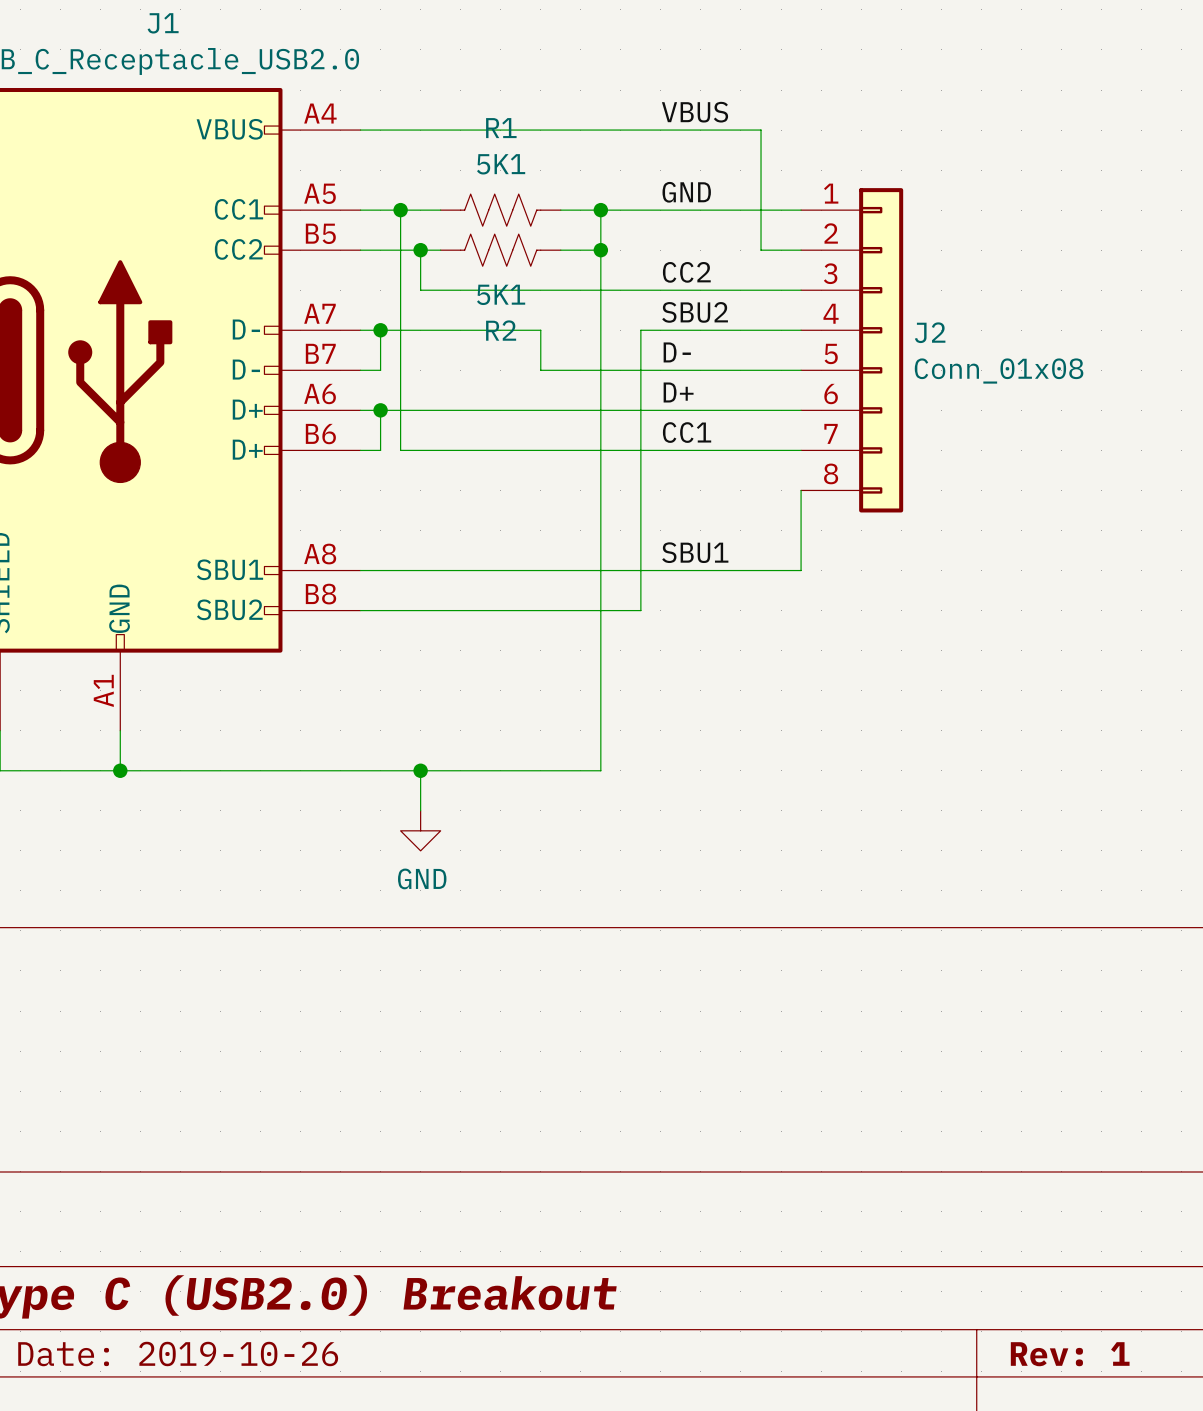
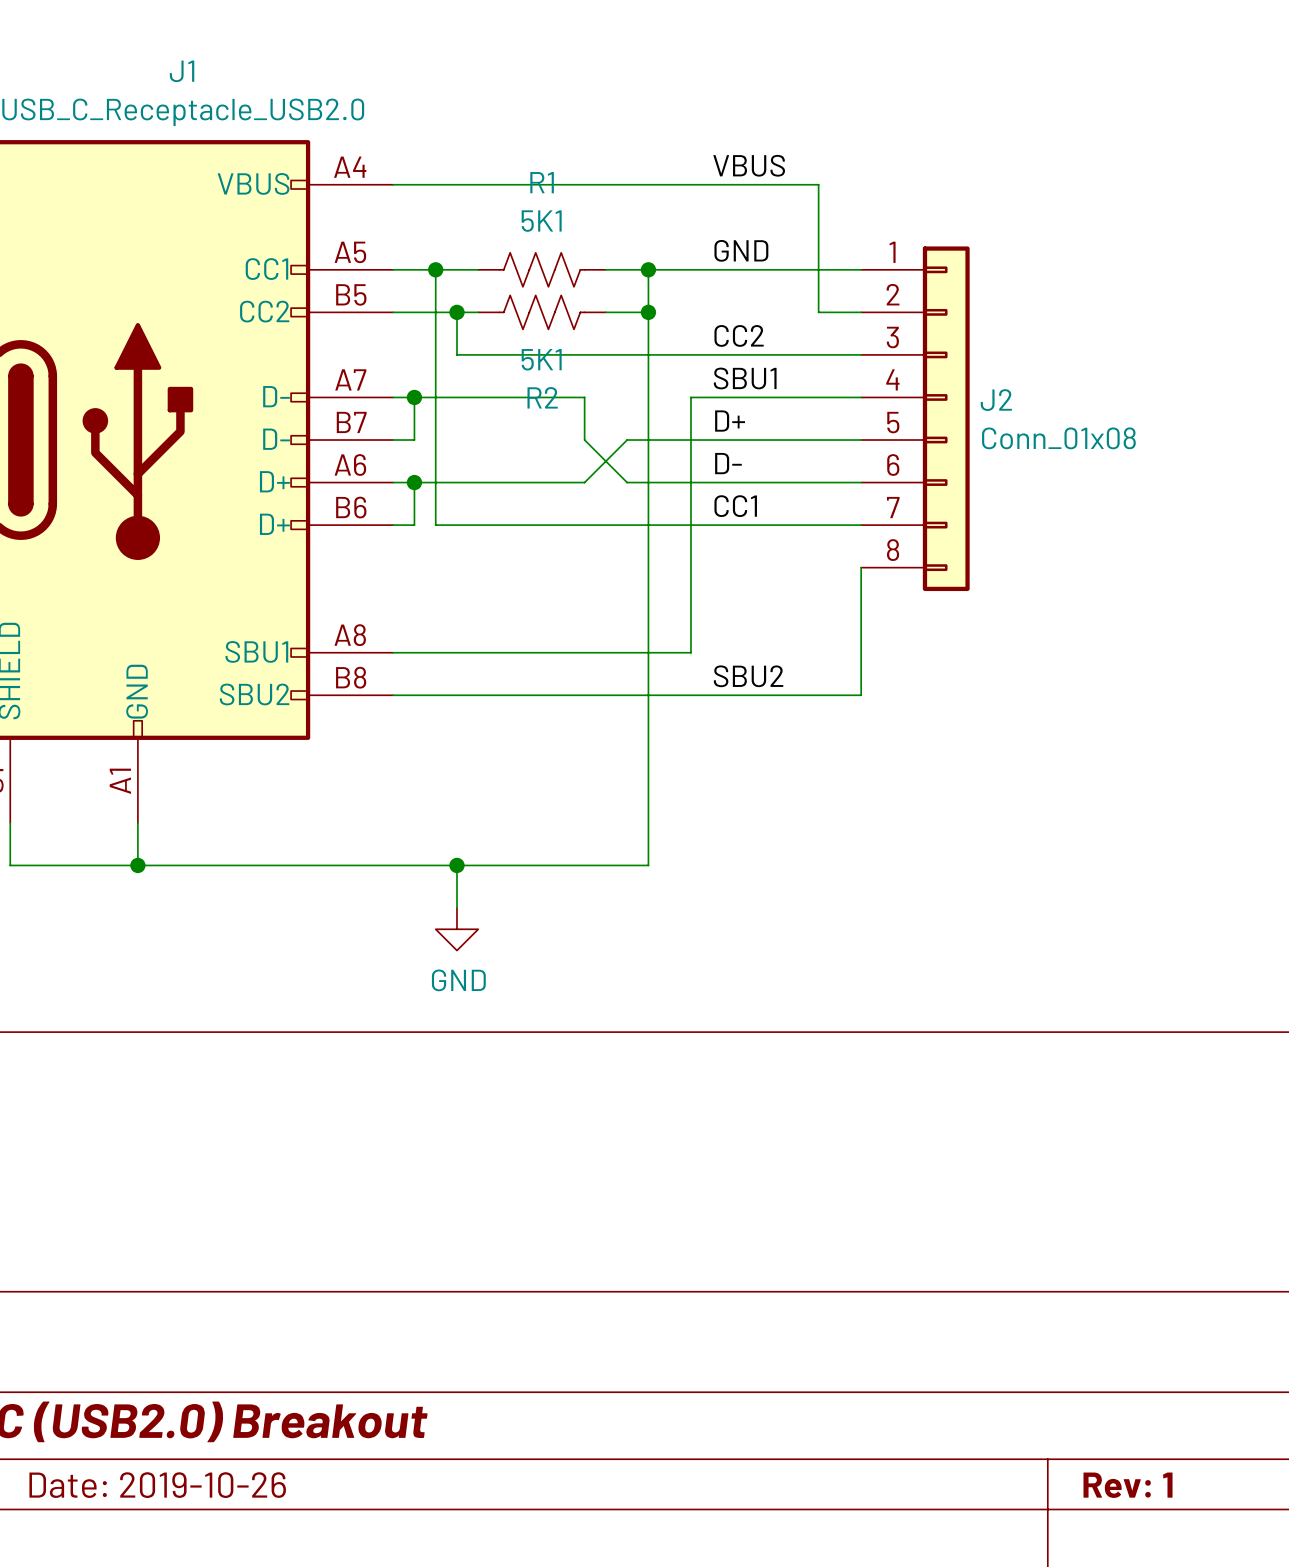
label: SBU2 (695, 312) -> SBU1 (745, 378)
label: D- (677, 352) -> D+ (730, 421)
wire: (540, 370) (580, 370) -> (584, 440) (627, 482)
label: D+ (678, 392) -> D- (728, 463)
wire: (540, 410) (580, 410) -> (584, 482) (627, 440)
label: SBU1 (695, 552) -> SBU2 (748, 676)
wire: (801, 570) (640, 570) (640, 610) -> (861, 652) (861, 695) (690, 695)

